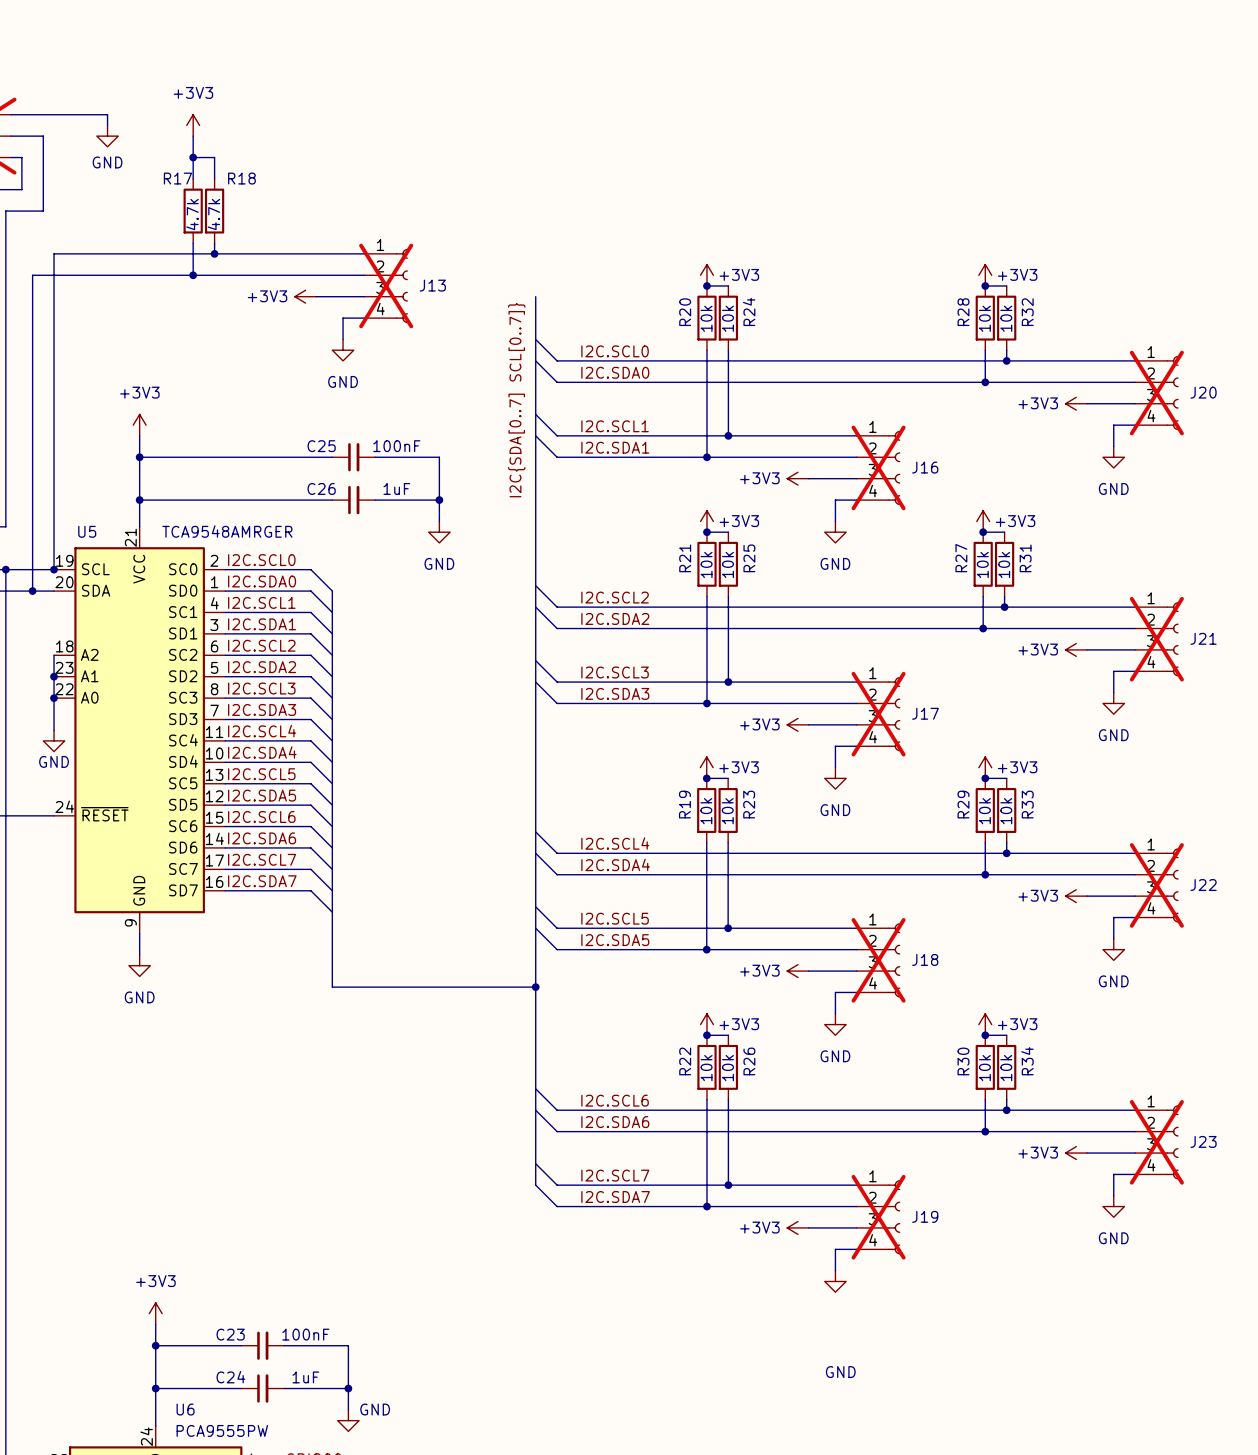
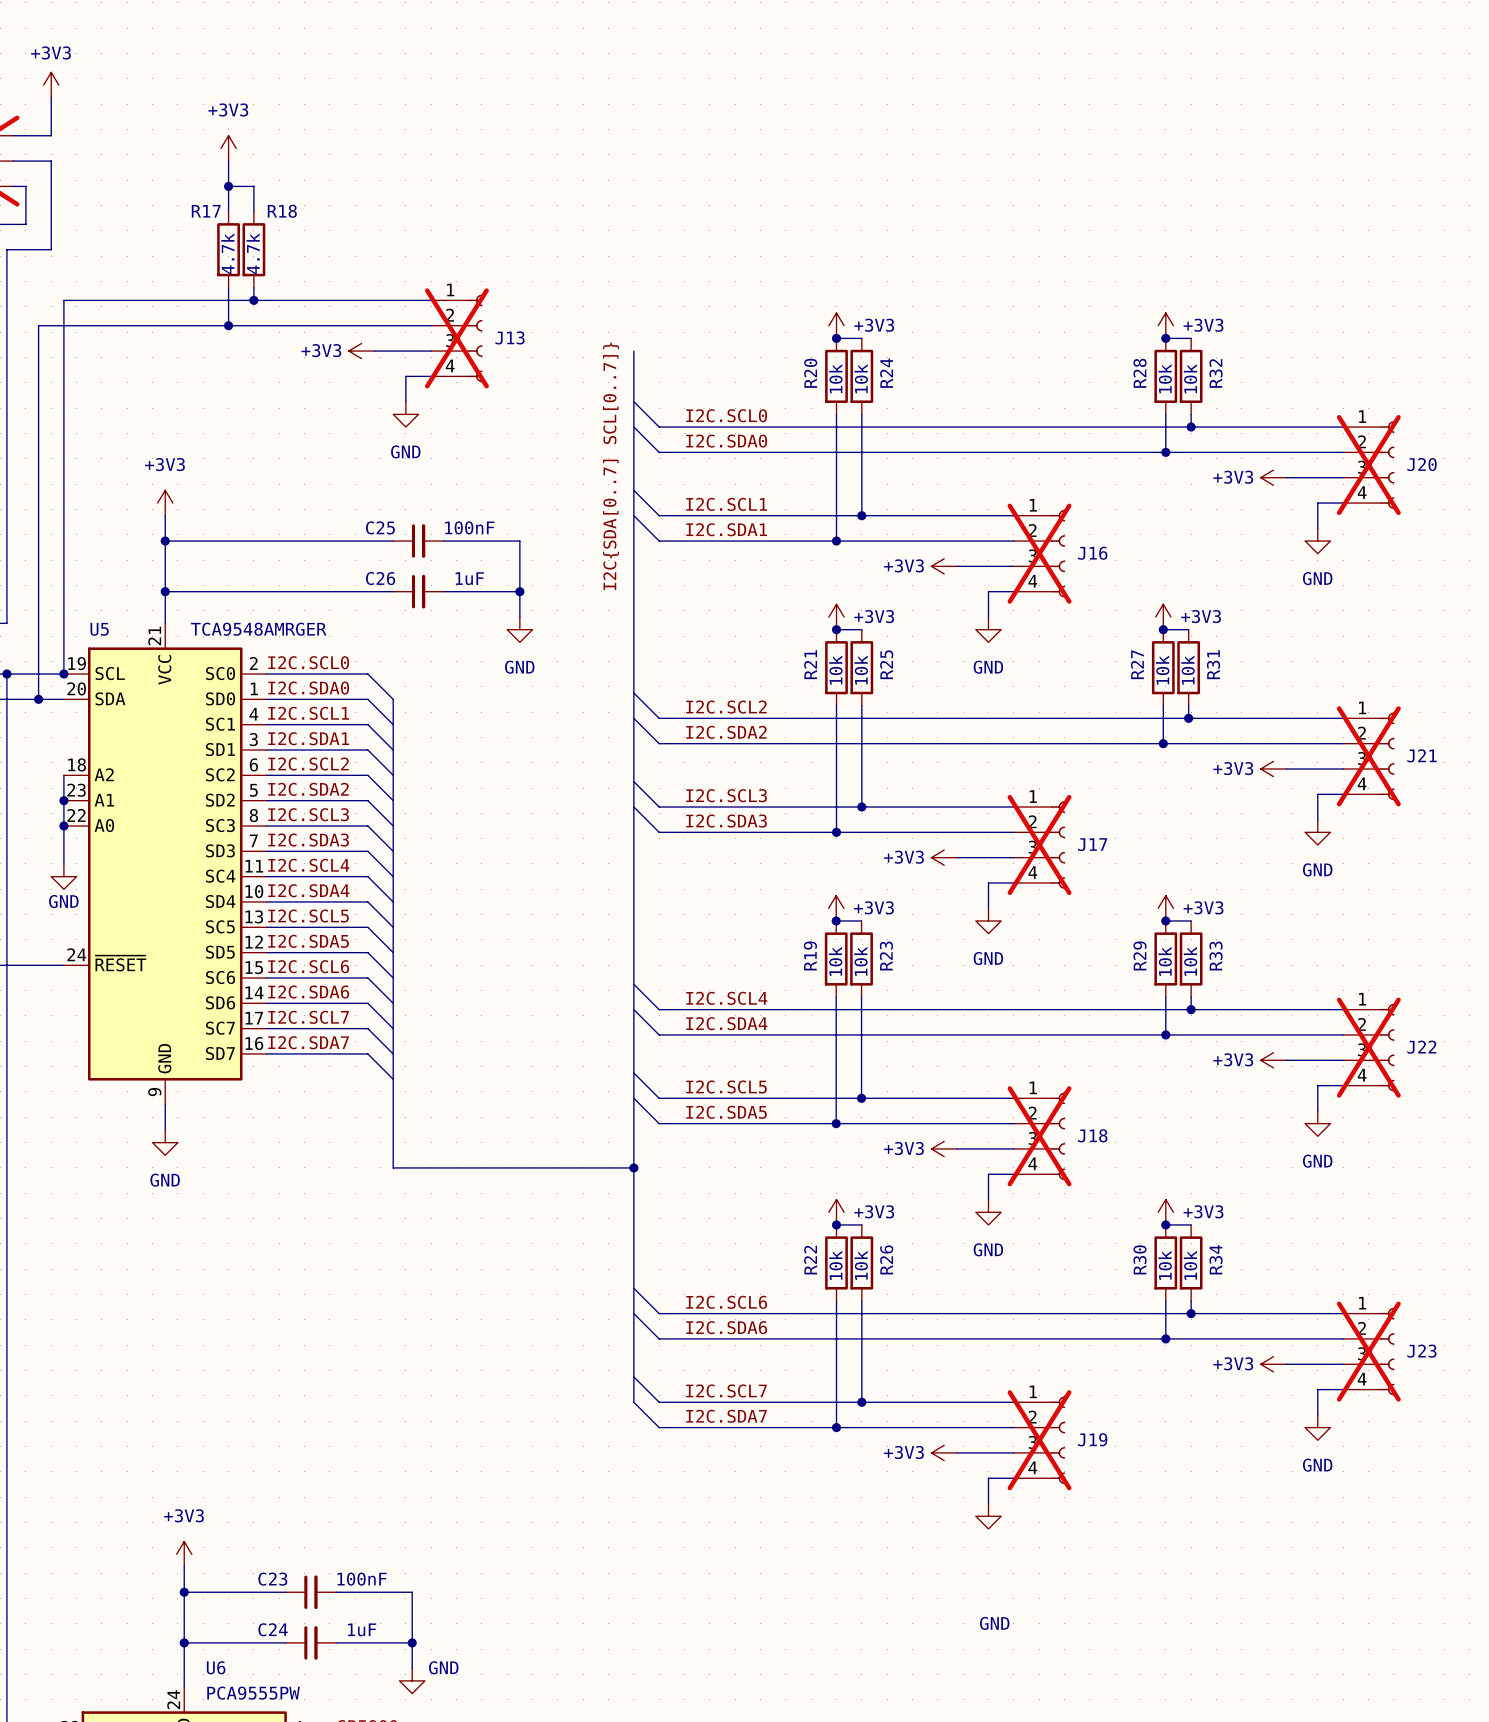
power symbol: none -> +3V3 (51, 85)
wire: (43, 114) (107, 114) (107, 125) -> (51, 135) (51, 97)
power symbol: GND (107, 136) -> none

